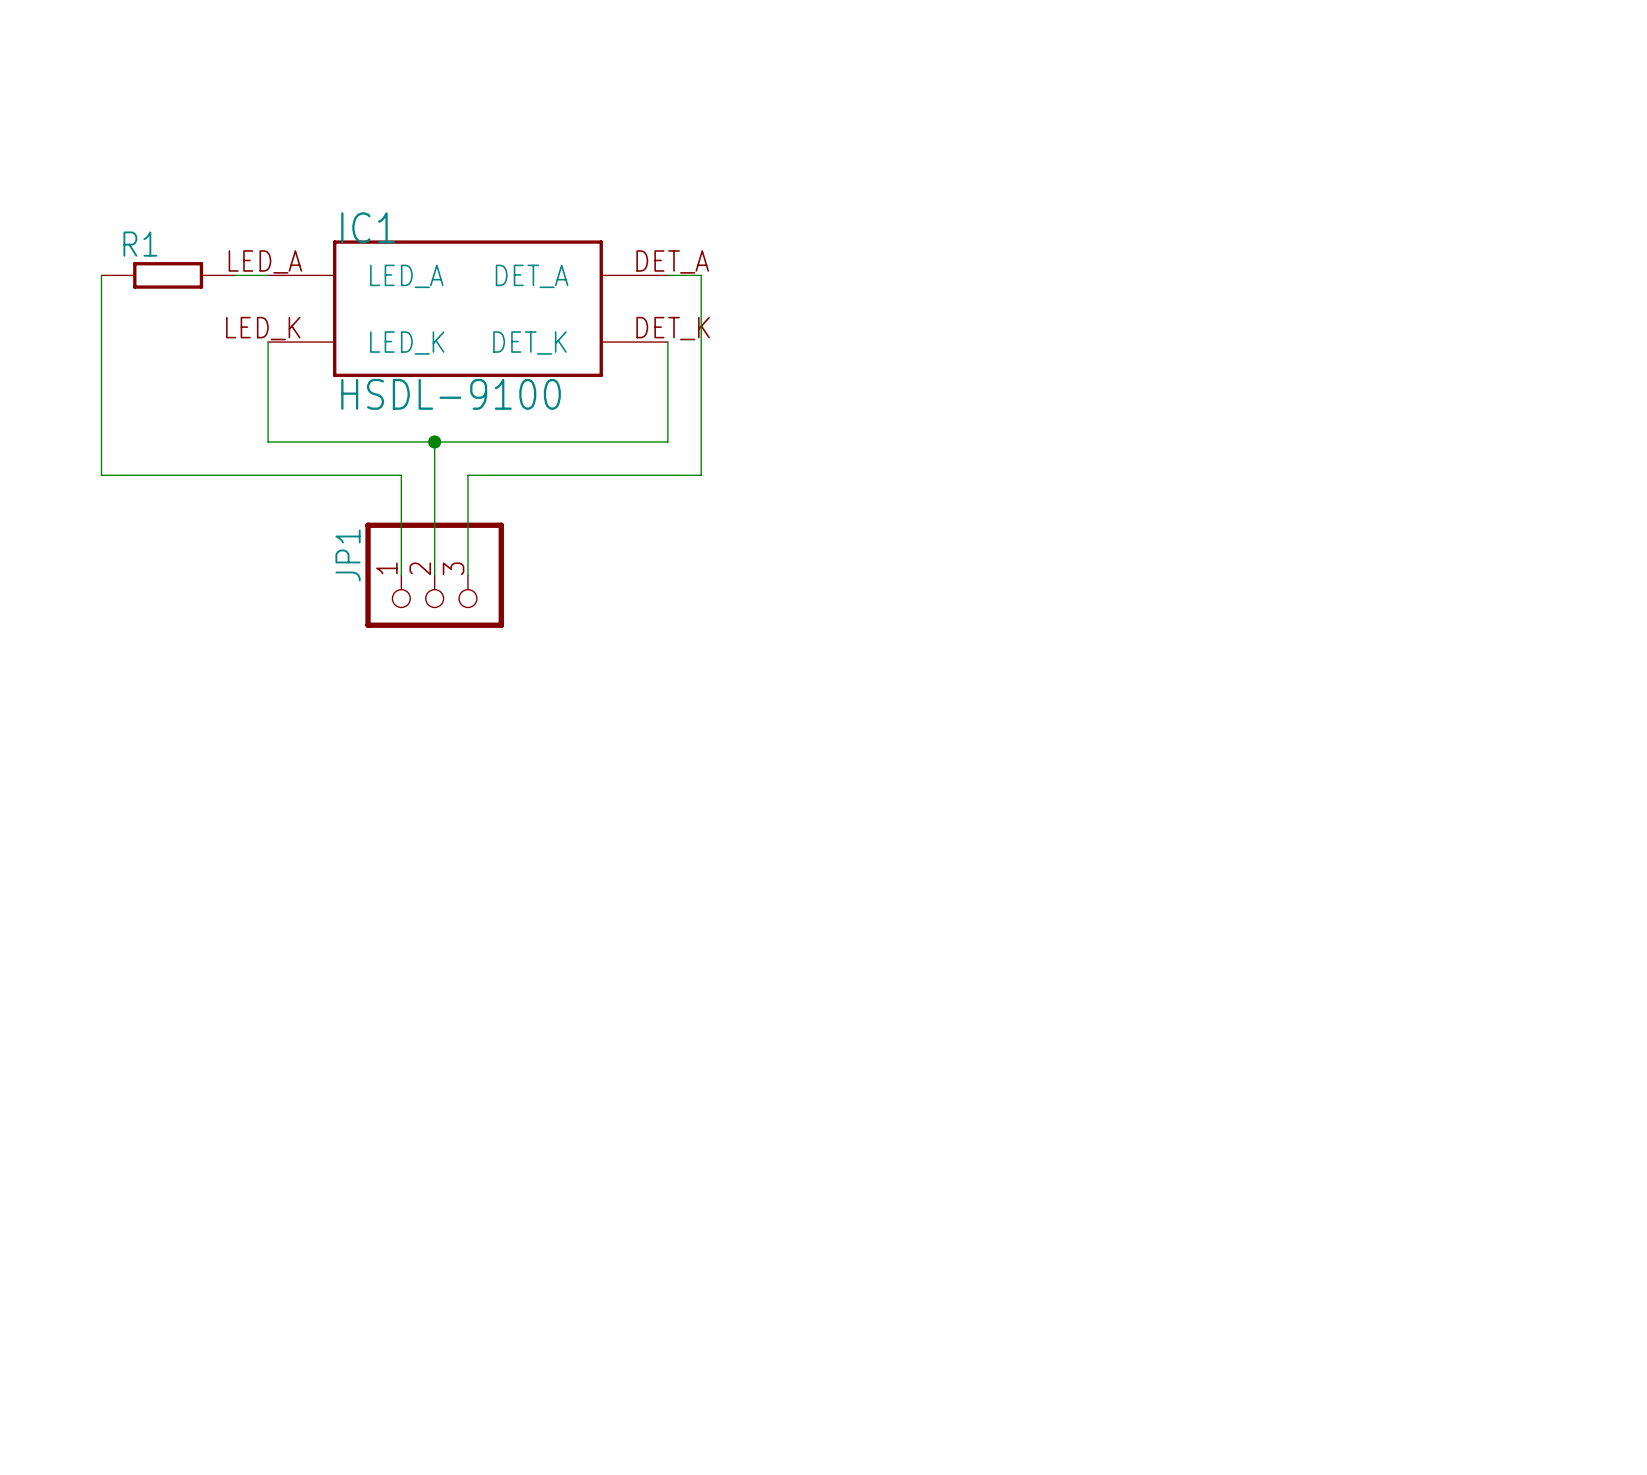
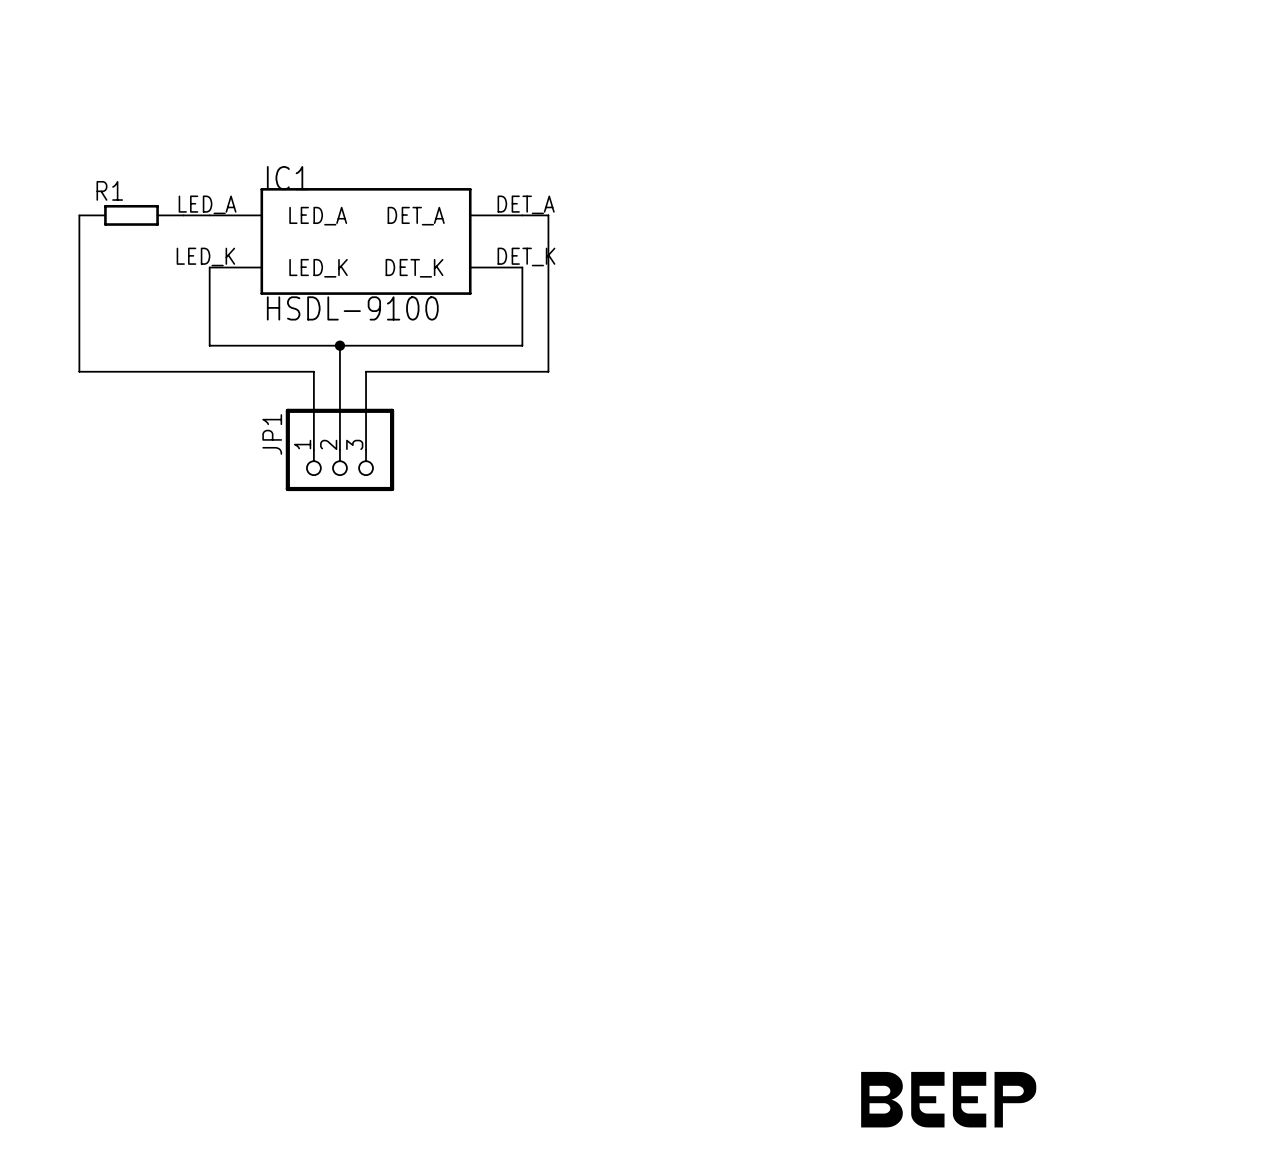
part: none -> (948, 1099)

